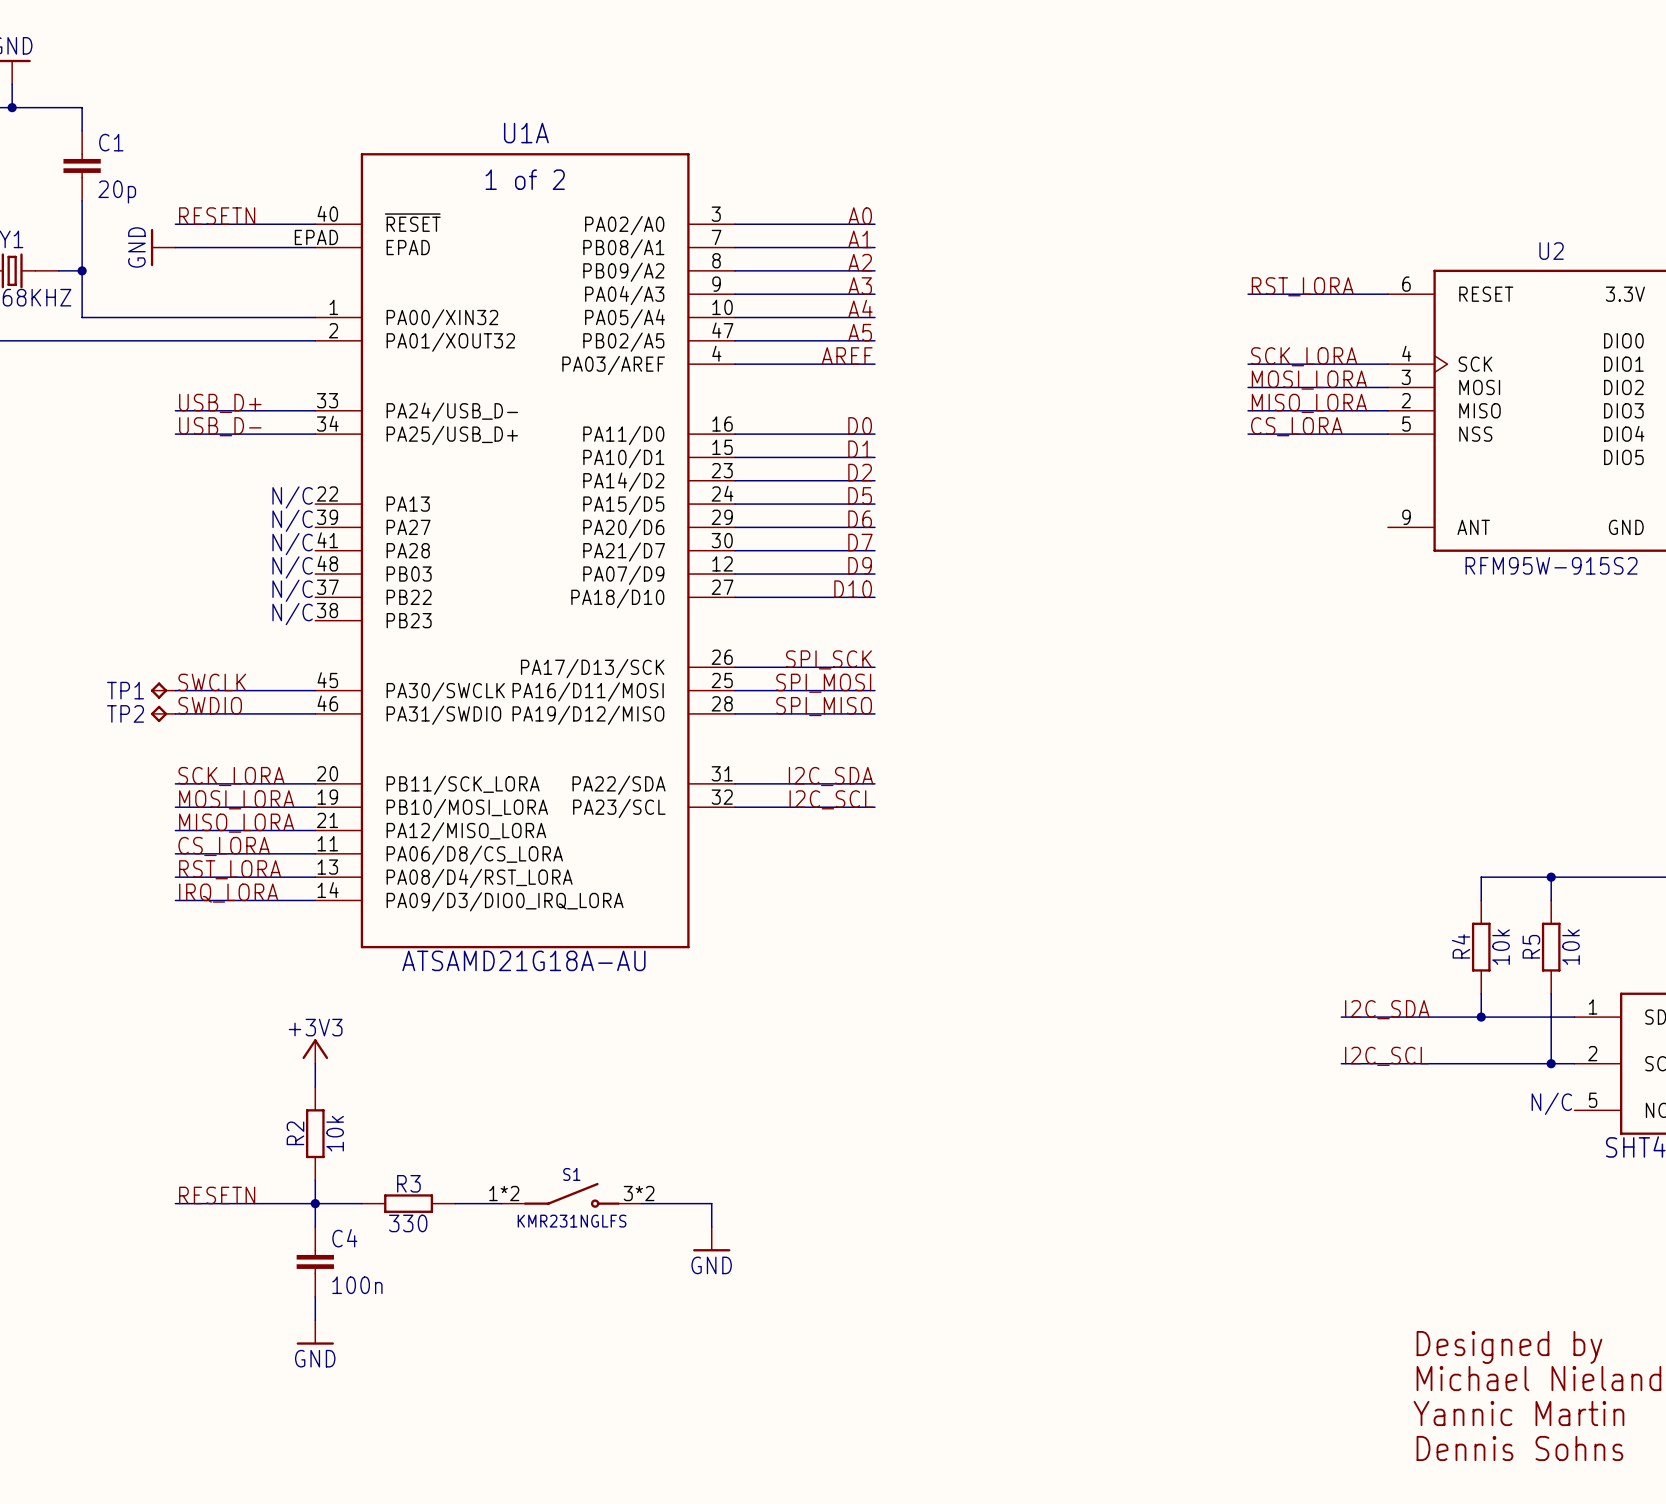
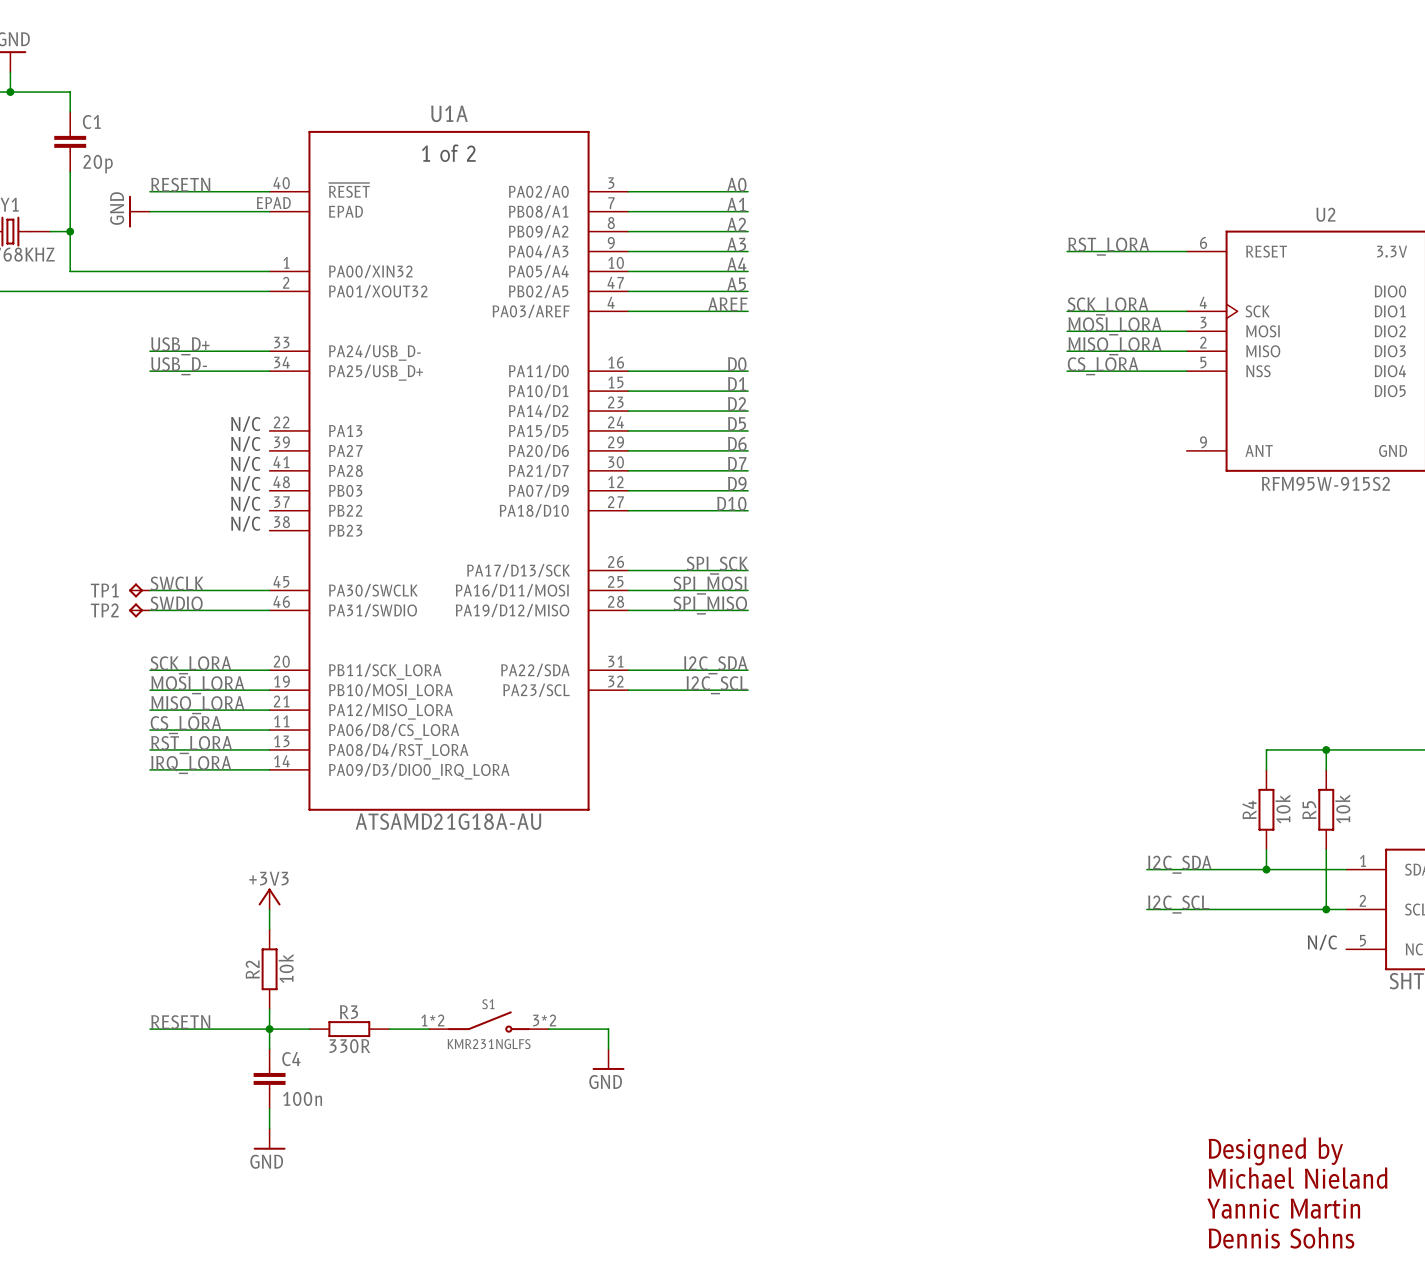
R3 value: 330 (408, 1223) -> 330R (349, 1046)

